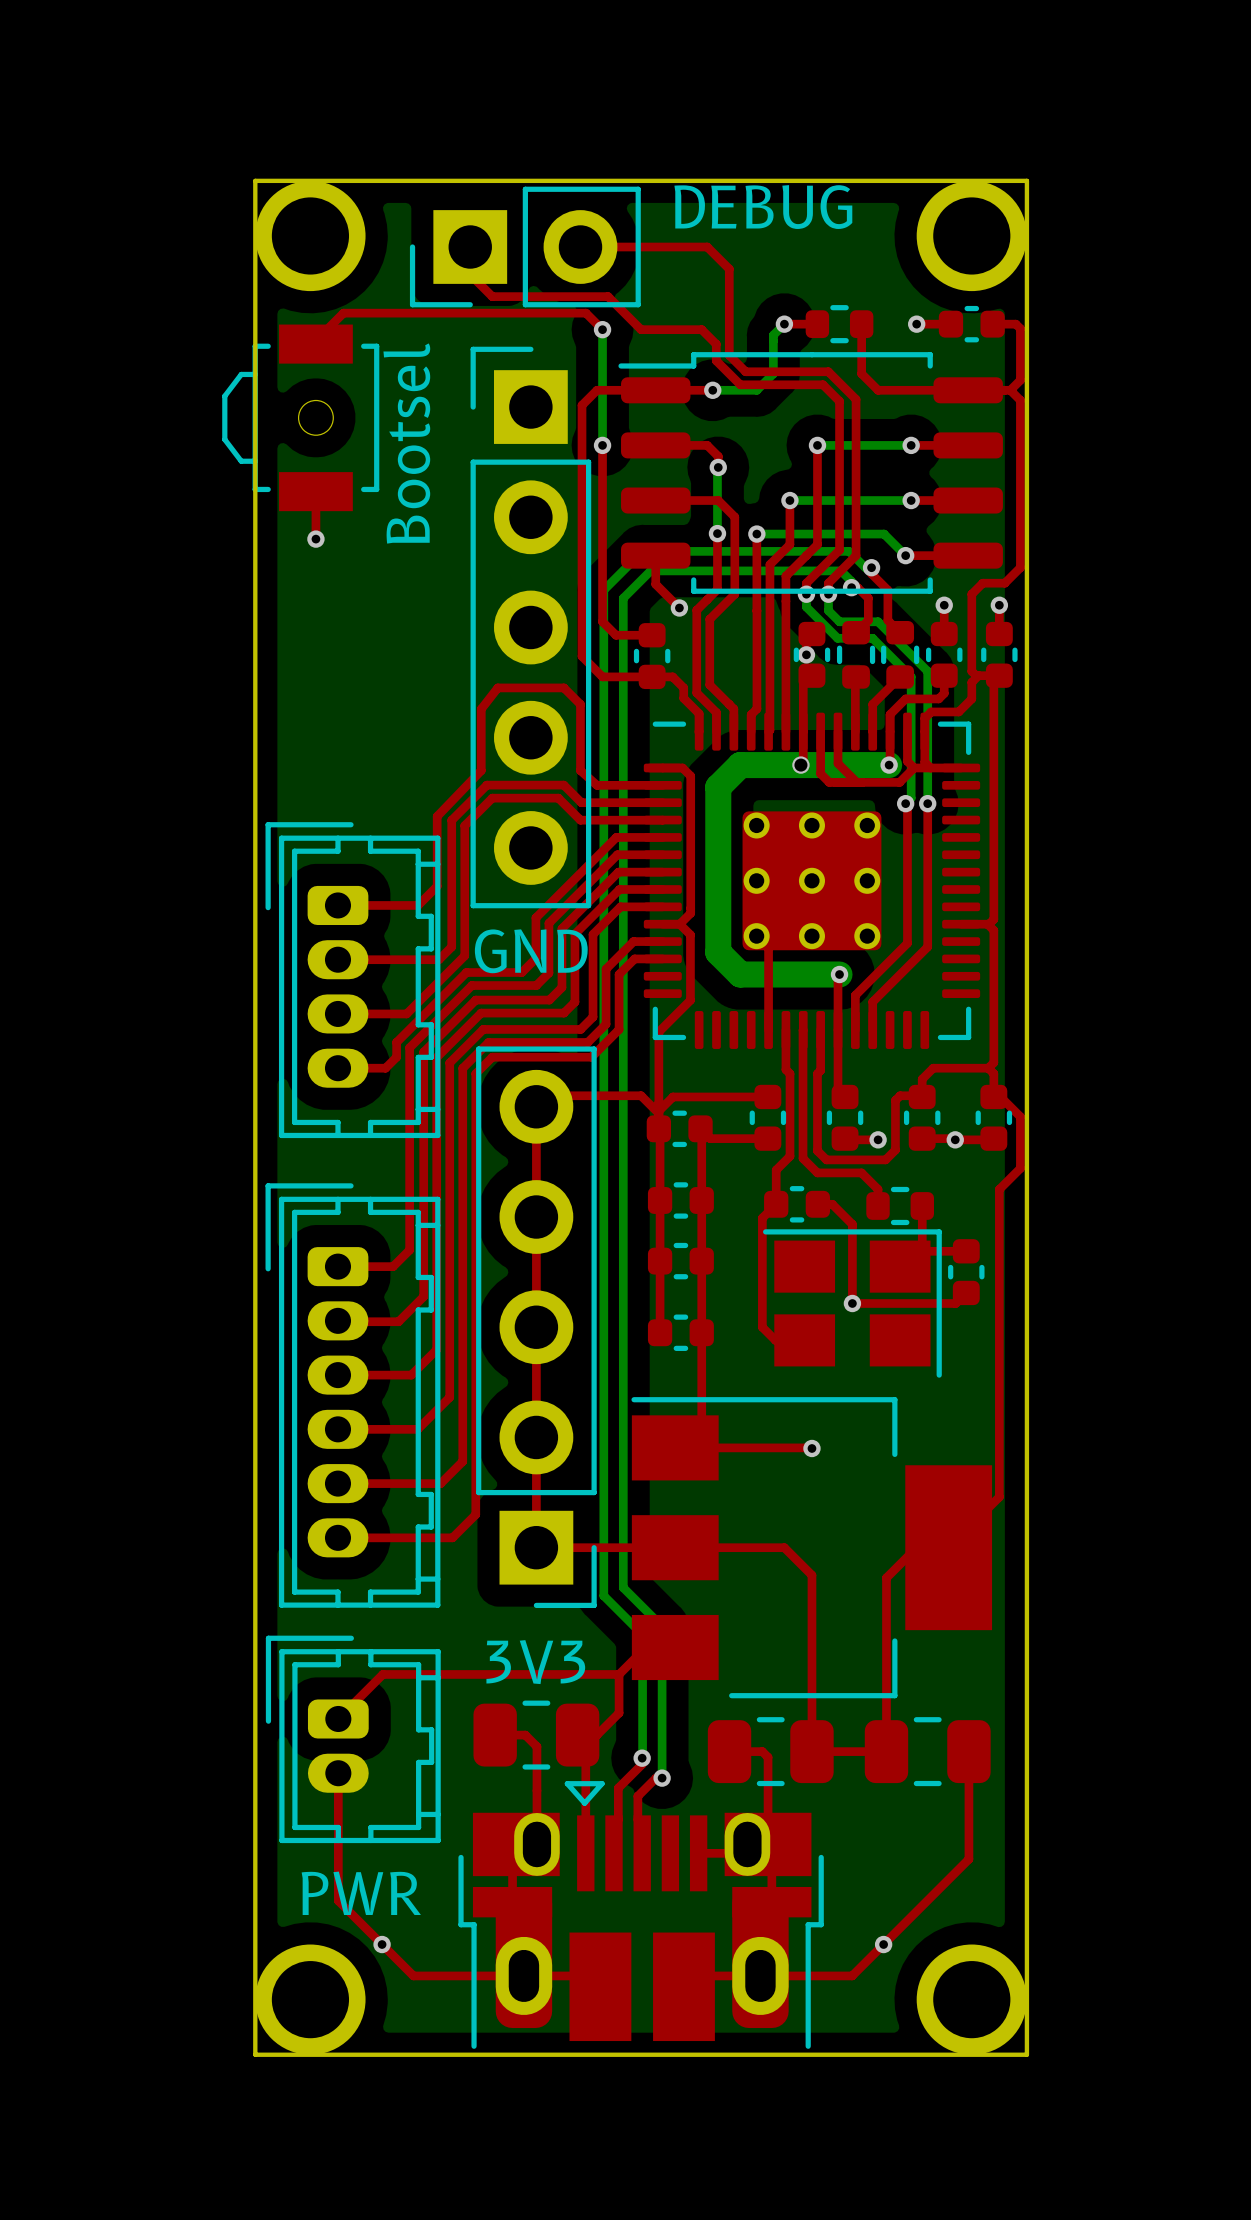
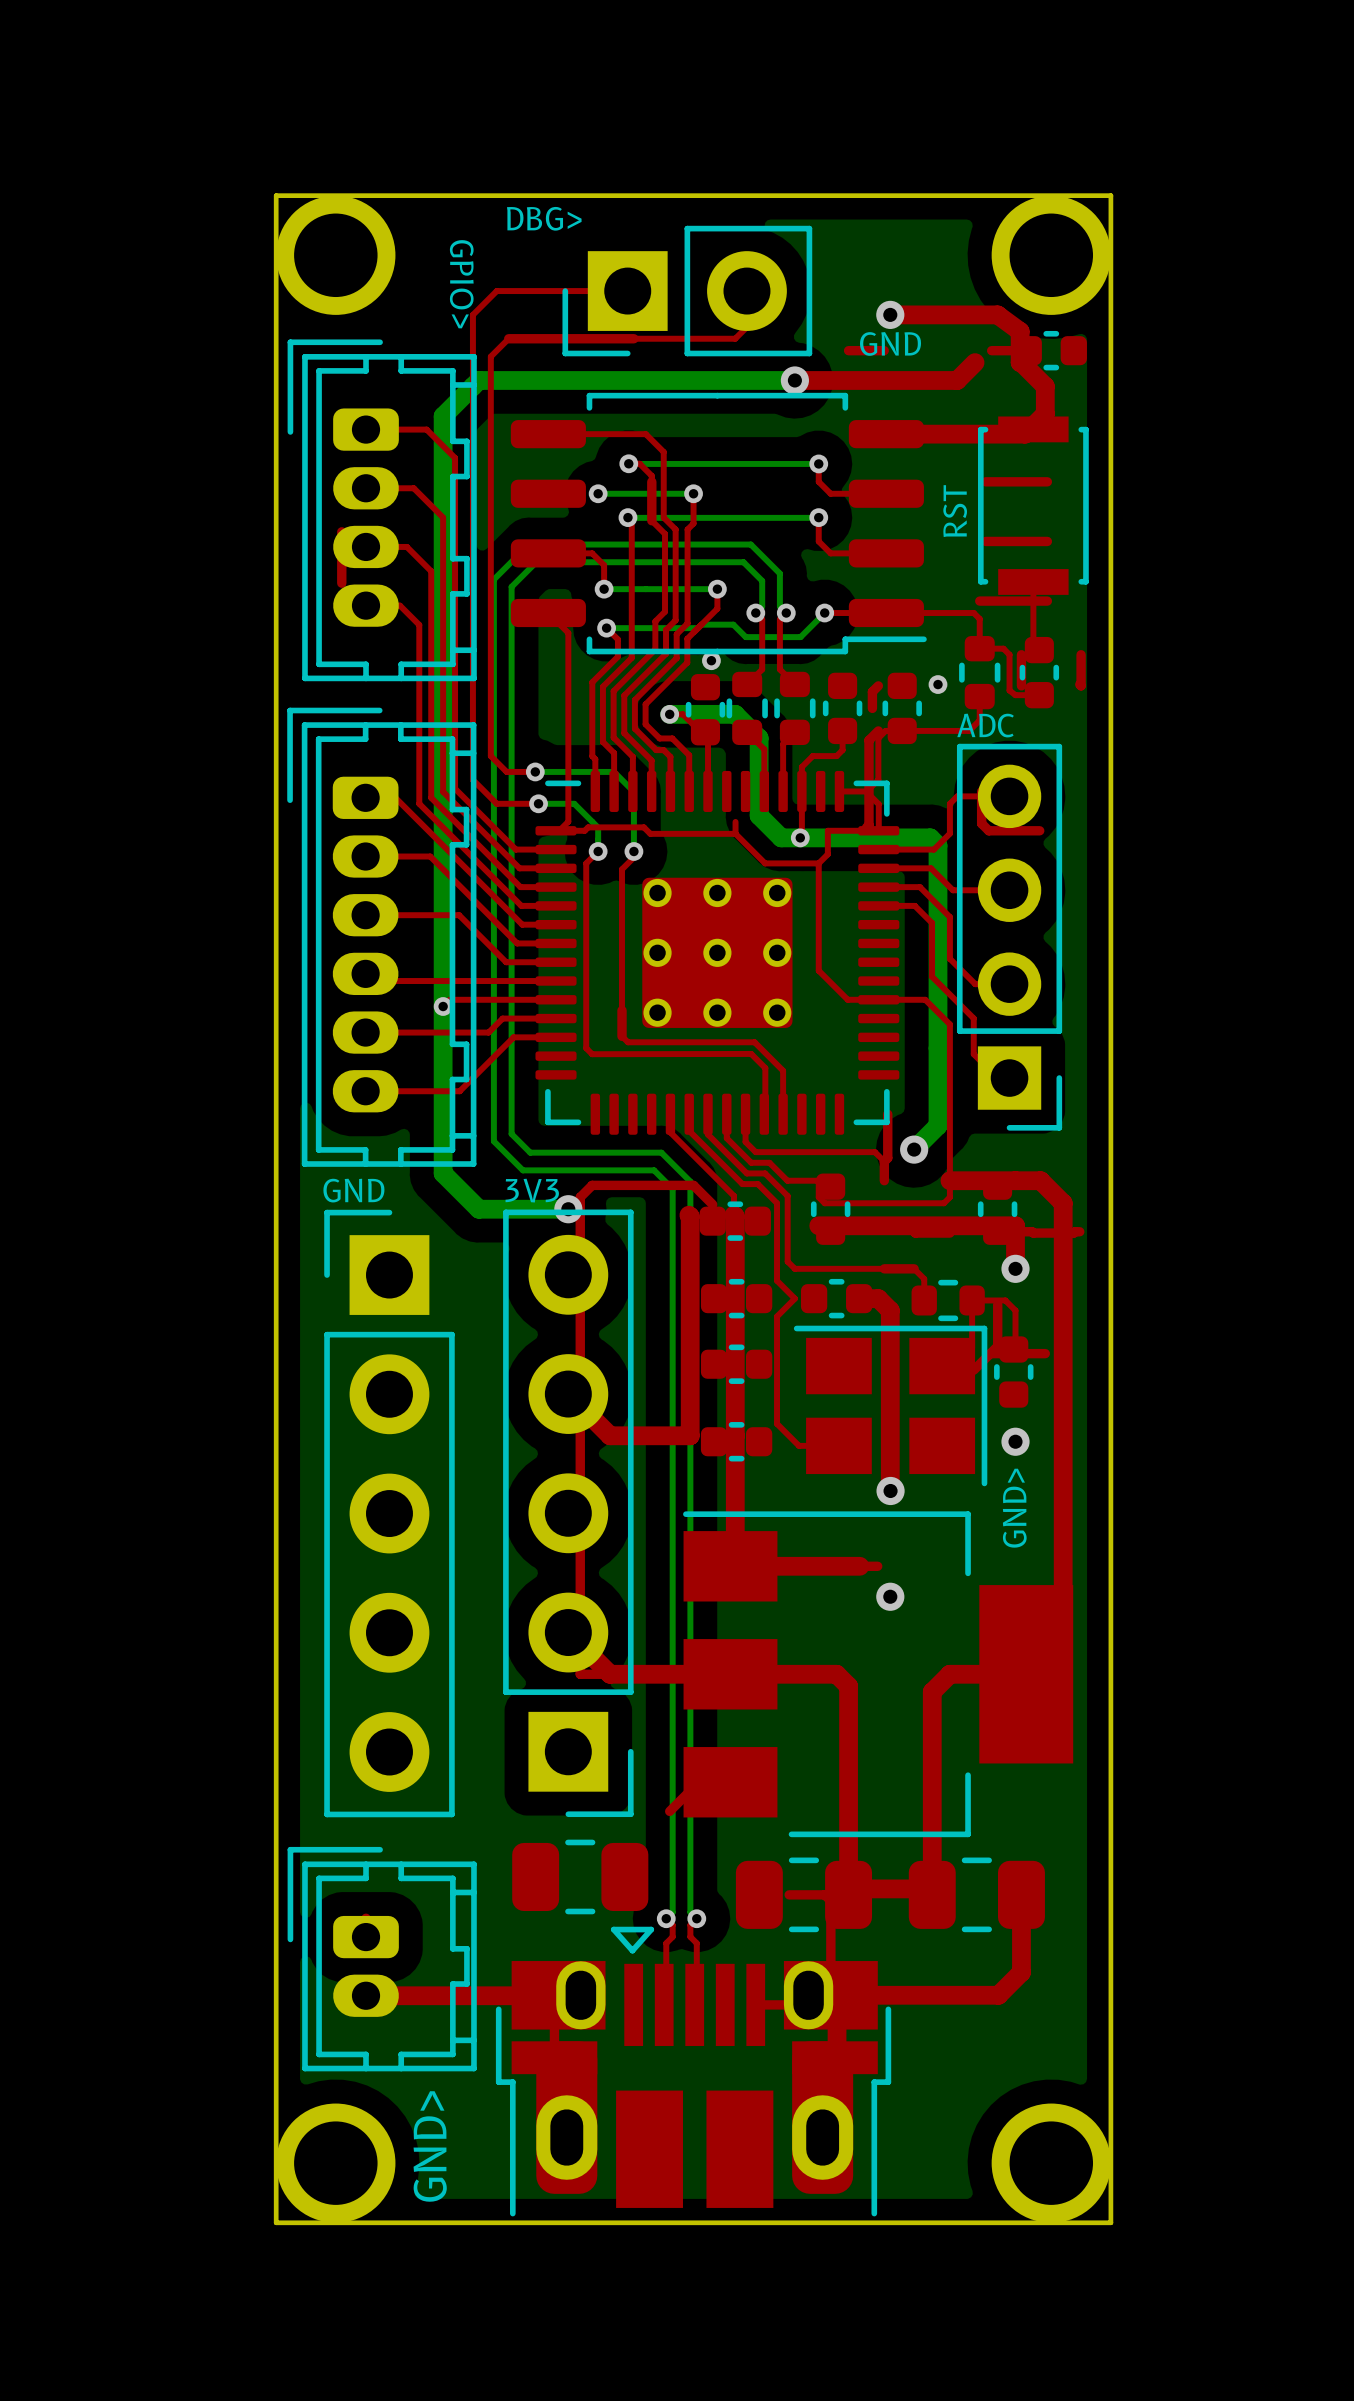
text: none -> DBG> (544, 218)
top track: (470, 247) (470, 274) (492, 296) (608, 296) (641, 329) (701, 329) (716, 344) (716, 360) (740, 384) (822, 384) (839, 401) (839, 550) (806, 583) (806, 594) -> none
part: DEBUG (525, 247) -> none
top track: (580, 247) (707, 247) (729, 269) (729, 355) (745, 371) (828, 371) (856, 399) (856, 555) (828, 583) (828, 594) -> none
text: none -> GPIO> (461, 284)
top track: none -> (627, 291) (496, 291) (472, 314) (472, 779) (496, 803) (538, 803)
part: none -> (687, 291)
top track: none -> (890, 314) (997, 314) (1020, 331) (1020, 362) (1045, 386) (1045, 413) (1025, 434) (886, 434)
via: none -> (890, 314)
top track: (470, 313) (343, 313) (315, 340) -> (508, 338) (490, 356) (490, 756) (506, 771) (535, 771)
top track: (586, 313) (602, 329) -> (633, 338) (735, 338) (746, 327) (746, 291)
text: none -> GND (890, 343)
bottom track: (784, 324) (773, 335) (773, 373) (756, 390) (712, 390) -> none
via: (784, 324) -> none
part: (839, 324) -> none
top track: (861, 324) (861, 373) (878, 390) (1010, 390) -> none
via: (916, 324) -> none
top track: (992, 324) (1015, 324) (1020, 328) (1020, 380) (1010, 390) -> none
bottom track: (602, 329) (602, 445) -> none
via: (602, 329) -> none
top track: none -> (975, 362) (957, 380) (794, 380)
bottom track: none -> (794, 380) (478, 380) (443, 416) (443, 1173) (478, 1209) (568, 1209)
via: none -> (794, 380)
top track: (712, 390) (597, 390) (582, 405) (582, 656) (602, 676) (672, 676) (683, 687) (683, 698) (699, 713) (699, 731) -> none
via: (712, 390) -> none
top track: (1010, 390) (1020, 400) (1020, 567) (1004, 583) (982, 583) (971, 594) (971, 671) (976, 675) (999, 675) (993, 681) (993, 919) (989, 924) (961, 924) -> none
top track: none -> (366, 429) (426, 429) (455, 457) (455, 788) (515, 849) (556, 849)
top track: none -> (548, 434) (645, 434) (663, 452) (663, 517) (675, 529) (675, 620) (666, 629) (666, 653) (624, 695) (624, 733) (651, 760) (651, 791)
part: Bootsel (300, 417) -> none
top track: none -> (628, 463) (639, 463) (651, 475) (651, 481)
bottom track: none -> (628, 463) (818, 463)
via: none -> (628, 463)
top track: none -> (818, 463) (818, 481) (830, 493) (886, 493)
via: none -> (818, 463)
via: (602, 445) -> none
top track: (655, 445) (707, 445) (718, 456) (718, 467) -> none
top track: (817, 445) (817, 544) (785, 576) (785, 731) -> none
bottom track: (817, 445) (911, 445) -> none
via: (817, 445) -> none
via: (911, 445) -> none
top track: none -> (366, 488) (413, 488) (443, 517) (443, 791) (519, 868) (556, 868)
bottom track: none -> (598, 493) (693, 493)
via: none -> (598, 493)
top track: none -> (693, 493) (693, 523) (687, 529) (687, 623) (676, 634) (676, 658) (634, 699) (634, 728) (656, 750) (663, 750) (670, 756) (670, 791)
via: none -> (693, 493)
bottom track: (718, 467) (717, 533) -> none
via: (718, 467) -> none
part: none -> (1033, 505)
part rotation: 0° (810, 472) -> 180° (718, 523)
text: none -> RST (955, 511)
top track: none -> (627, 517) (631, 521) (631, 657) (602, 686) (602, 742) (614, 753) (614, 791)
bottom track: none -> (628, 517) (818, 517)
via: none -> (627, 517)
top track: none -> (818, 517) (818, 541) (830, 553) (886, 553)
via: none -> (818, 517)
top track: (602, 481) (602, 621) (615, 635) (652, 635) -> (651, 520) (665, 533) (665, 611) (655, 621) (655, 649) (613, 691) (613, 737) (632, 756) (632, 791)
top track: (655, 500) (718, 500) (734, 517) (734, 594) (709, 619) (709, 684) (733, 709) (733, 731) -> none
top track: (789, 500) (789, 544) (769, 564) (768, 731) -> none
bottom track: (789, 500) (911, 500) -> none
via: (789, 500) -> none
via: (911, 500) -> none
top track: none -> (366, 546) (406, 546) (431, 571) (431, 797) (520, 887) (556, 887)
top track: none -> (548, 553) (592, 553) (604, 565) (604, 589)
top track: (717, 533) (717, 589) (696, 610) (696, 692) (716, 712) (716, 731) -> none
via: (717, 533) -> none
top track: (756, 534) (756, 610) -> none
bottom track: (756, 534) (884, 534) (905, 555) -> none
via: (756, 534) -> none
via: (315, 539) -> none
top track: none -> (1033, 585) (1033, 644) (1039, 650)
bottom track: none -> (604, 589) (717, 589)
via: none -> (604, 589)
top track: none -> (717, 589) (717, 608) (687, 638) (687, 662) (645, 704) (645, 724) (659, 738) (672, 738) (689, 755) (689, 791)
via: none -> (717, 589)
top track: (655, 555) (655, 584) (679, 608) -> none
via: (905, 555) -> none
top track: none -> (366, 605) (399, 605) (419, 624) (419, 803) (521, 905) (556, 905)
top track: none -> (548, 613) (568, 632) (568, 821) (559, 830)
top track: none -> (755, 613) (762, 619) (762, 669) (747, 684)
bottom track: none -> (755, 613) (762, 606) (762, 580) (743, 562) (536, 562) (511, 586) (511, 1134) (530, 1152) (661, 1152) (690, 1181) (690, 1912) (696, 1918)
via: none -> (755, 613)
top track: none -> (786, 613) (779, 619) (779, 669) (794, 684)
bottom track: none -> (786, 613) (779, 606) (779, 573) (750, 544) (528, 544) (493, 579) (493, 1141) (522, 1170) (654, 1170) (672, 1188) (672, 1912) (666, 1918)
via: none -> (786, 613)
top track: none -> (824, 613) (973, 613) (979, 618) (979, 648) (1003, 648) (1009, 654) (1009, 690) (1015, 695) (1039, 695)
bottom track: none -> (824, 613) (800, 637) (745, 637) (733, 624) (701, 624) (697, 628) (606, 628)
via: none -> (824, 613)
top track: (871, 567) (871, 573) (887, 590) (887, 620) (900, 632) -> none
bottom track: (871, 567) (865, 567) (849, 551) (642, 551) (603, 590) (603, 1595) (642, 1634) (642, 1757) -> none
via: (871, 567) -> none
top track: none -> (606, 628) (617, 639) (617, 656) (592, 682) (592, 756) (595, 759) (595, 791)
via: none -> (606, 628)
top track: (851, 587) (857, 587) (868, 598) (868, 620) (856, 632) -> none
bottom track: (851, 587) (851, 581) (840, 570) (650, 570) (623, 598) (623, 1587) (662, 1626) (662, 1778) -> none
via: (851, 587) -> none
bottom track: (806, 594) (806, 607) (837, 638) (872, 638) (911, 676) (911, 798) (905, 803) -> none
via: (806, 594) -> none
bottom track: (828, 594) (828, 610) (839, 621) (878, 621) (927, 671) (927, 803) -> none
via: (828, 594) -> none
via: (944, 605) -> none
via: (999, 605) -> none
via position: (679, 608) -> (711, 660)
top track: (756, 610) (756, 708) (751, 714) (751, 731) -> none
part: none -> (979, 672)
part: none -> (1039, 672)
part: GND (530, 627) -> none
via: none -> (937, 684)
top track: none -> (979, 696) (979, 720) (969, 730) (885, 730) (878, 738) (878, 779) (866, 791) (839, 791)
part: none -> (747, 708)
part: none -> (794, 708)
part: none -> (842, 708)
via: (806, 654) -> none
part: (811, 654) -> none
part: none -> (902, 708)
part: (856, 654) -> none
part: (900, 654) -> none
part: (944, 654) -> none
part: (999, 654) -> none
top track: none -> (669, 714) (682, 714) (708, 739) (708, 791)
bottom track: none -> (669, 714) (735, 714) (759, 738) (759, 815) (781, 837) (930, 837) (937, 845) (937, 1125) (914, 1149)
via: none -> (669, 714)
text: none -> ADC (985, 725)
top track: none -> (842, 730) (842, 750) (836, 756) (812, 756) (801, 766) (801, 836) (800, 837)
top track: (944, 675) (944, 693) (938, 698) (905, 698) (890, 714) (889, 765) -> none
top track: (978, 675) (971, 682) (971, 698) (958, 711) (931, 711) (924, 718) (924, 762) (930, 767) -> none
top track: none -> (747, 732) (764, 749) (764, 791)
top track: none -> (794, 732) (783, 744) (783, 791)
top track: (856, 676) (855, 731) -> none
top track: (900, 676) (872, 704) (872, 731) -> none
bottom track: none -> (535, 771) (614, 771) (633, 791) (633, 851)
via: none -> (535, 771)
top track: none -> (866, 791) (878, 804) (878, 830) (827, 830) (827, 854) (818, 863)
top track: (820, 731) (820, 773) (829, 782) (899, 782) (914, 767) -> none
top track: (838, 731) (838, 763) (856, 782) -> none
top track: none -> (1009, 796) (957, 796) (949, 803) (949, 833) (933, 849) (878, 849)
top track: none -> (365, 797) (395, 797) (522, 924) (556, 924)
bottom track: none -> (538, 803) (574, 803) (598, 827) (598, 851)
via: none -> (538, 803)
top track: none -> (735, 821) (735, 833)
via: (800, 765) -> none
bottom track: (889, 765) (740, 765) (718, 787) (718, 952) (740, 974) (839, 974) -> none
via: (889, 765) -> none
top track: none -> (556, 830) (584, 830) (588, 827) (643, 827) (650, 833) (735, 833)
top track: (649, 767) (682, 767) (690, 776) (690, 913) (679, 924) (690, 934) (690, 1000) (658, 1031) (660, 1332) (663, 1329) -> none
top track: none -> (735, 833) (765, 863) (818, 863)
via: none -> (800, 837)
top track: (662, 785) (597, 785) (580, 770) (580, 704) (563, 687) (497, 687) (481, 709) (481, 770) (437, 816) (437, 886) (418, 905) (337, 905) -> none
top track: none -> (598, 851) (586, 863) (586, 1048) (592, 1054) (751, 1053) (765, 1068) (764, 1114)
via: none -> (598, 851)
via: none -> (633, 851)
top track: none -> (365, 856) (430, 856) (517, 943) (556, 943)
top track: none -> (818, 863) (818, 970) (847, 999) (925, 999) (949, 1024) (949, 1197) (943, 1203) (824, 1203) (818, 1197) (818, 1180) (787, 1180) (769, 1162) (751, 1162) (726, 1138) (726, 1114)
top track: (662, 802) (581, 802) (563, 785) (486, 785) (451, 820) (451, 946) (438, 959) (337, 959) -> none
top track: none -> (878, 868) (931, 868) (952, 890) (1009, 890)
top track: (905, 803) (907, 805) (907, 943) (855, 995) (855, 1029) -> none
via: (905, 803) -> none
top track: (927, 803) (927, 946) (872, 1001) (872, 1029) -> none
via: (927, 803) -> none
top track: (662, 820) (580, 820) (558, 798) (492, 798) (464, 825) (464, 955) (406, 1013) (337, 1013) -> none
top track: none -> (878, 887) (919, 887) (949, 917) (949, 958) (975, 984) (1009, 984)
top track: (662, 837) (616, 837) (535, 917) (535, 958) (521, 972) (466, 972) (396, 1042) (396, 1057) (385, 1068) (337, 1068) -> none
top track: none -> (878, 905) (914, 905) (932, 923) (932, 976) (973, 1018) (973, 1054) (997, 1078) (1009, 1078)
top track: none -> (365, 915) (459, 915) (506, 962) (556, 962)
top track: (662, 854) (617, 854) (548, 923) (548, 972) (536, 985) (471, 985) (409, 1047) (409, 1250) (393, 1266) (337, 1266) -> none
part: none -> (381, 937)
part: none -> (1009, 937)
top track: (662, 872) (618, 872) (561, 928) (561, 987) (549, 1000) (475, 1000) (423, 1052) (423, 1296) (398, 1321) (337, 1320) -> none
part position: (811, 880) -> (717, 952)
top track: (662, 889) (619, 889) (574, 934) -> (633, 851) (633, 857) (622, 869) (622, 1010)
top track: none -> (365, 973) (372, 981) (556, 981)
top track: (662, 906) (620, 906) (593, 934) (593, 1017) (580, 1029) (483, 1029) (449, 1062) (449, 1397) (417, 1429) (337, 1429) -> none
top track: none -> (556, 999) (449, 999) (443, 1006)
top track: (987, 924) (993, 930) (993, 1062) (988, 1068) -> none
via: none -> (443, 1006)
top track: (756, 936) (768, 948) (768, 1029) -> none
top track: none -> (556, 1018) (502, 1018) (488, 1032) (365, 1032)
top track: (662, 941) (633, 941) (606, 969) (606, 1024) (587, 1042) (488, 1042) (462, 1068) (462, 1461) (440, 1483) (337, 1483) -> none
top track: (574, 957) (574, 1002) (563, 1013) (481, 1013) (436, 1057) (436, 1349) (411, 1375) (337, 1375) -> (622, 1036) (627, 1042) (754, 1042) (783, 1070) (783, 1114)
top track: none -> (556, 1037) (513, 1037) (459, 1091) (365, 1091)
top track: (662, 958) (634, 958) (619, 974) (619, 1029) (591, 1057) (492, 1057) (475, 1073) (475, 1514) (452, 1537) (337, 1537) -> none
top track: (839, 974) (838, 1089) (845, 1096) -> none
via: (839, 974) -> none
part position: (352, 980) -> (382, 510)
top track: none -> (689, 1114) (689, 1130) (742, 1184) (757, 1184) (777, 1203) (777, 1280) (794, 1298) (777, 1316) (777, 1423) (799, 1445) (838, 1445)
top track: none -> (745, 1114) (745, 1141) (755, 1152) (874, 1152) (884, 1161)
top track: (785, 1029) (785, 1069) (790, 1073) (790, 1156) (776, 1170) (776, 1204) (762, 1218) (762, 1327) (775, 1340) (804, 1340) -> none
top track: (803, 1030) (803, 1158) (817, 1172) -> (708, 1114) (708, 1134) (746, 1173) (765, 1173) (787, 1196) (787, 1261) (794, 1268) (884, 1268)
via: none -> (914, 1149)
top track: (988, 1068) (993, 1073) (993, 1096) (1000, 1096) (1020, 1116) (1020, 1168) (999, 1189) (999, 1497) (948, 1547) -> (949, 1180) (1040, 1180) (1063, 1203) (1063, 1644) (1033, 1674) (1026, 1674)
top track: (988, 1068) (933, 1068) (922, 1079) (922, 1096) (900, 1095) (895, 1100) (895, 1150) (885, 1159) (826, 1159) (817, 1150) (817, 1091) -> none
top track: (767, 1096) (672, 1096) (658, 1111) -> none
text: none -> GND (353, 1190)
text: none -> 3V3 (532, 1190)
via: none -> (568, 1209)
part: (845, 1117) -> none
part: (993, 1117) -> none
top track: none -> (688, 1215) (690, 1435) (610, 1435) (568, 1394)
top track: (700, 1128) (710, 1138) (767, 1138) -> none
top track: (701, 1130) (701, 1421) (679, 1443) -> (669, 1114) (670, 1132) (733, 1195) (735, 1561)
top track: none -> (818, 1225) (1015, 1225) (1015, 1268)
via: (878, 1139) -> none
via: (955, 1139) -> none
top track: (845, 1172) (861, 1172) (878, 1189) (878, 1205) -> (914, 1268) (924, 1278) (924, 1300)
via: none -> (1015, 1268)
part footprint: [265, 1183, 441, 1608] -> [324, 1209, 455, 1818]
top track: none -> (859, 1298) (878, 1298) (890, 1310) (890, 1490)
part position: (797, 1204) -> (836, 1298)
top track: (817, 1204) (832, 1204) (852, 1224) (852, 1303) (955, 1303) (966, 1292) -> none
part position: (900, 1205) -> (948, 1300)
top track: none -> (1013, 1349) (1015, 1347) (1015, 1310) (1005, 1300) (972, 1300) (972, 1347) (954, 1366) (942, 1366)
part position: (966, 1272) -> (1013, 1372)
part position: (852, 1303) -> (890, 1405)
via: (852, 1303) -> none
part: 3V3 (536, 1327) -> none
via: none -> (1015, 1441)
via: none -> (890, 1490)
text: none -> GND> (1014, 1508)
part: none -> (568, 1513)
top track width: thin (679, 1443) (675, 1447) (794, 1447) -> thick (735, 1561) (730, 1566) (859, 1566)
via: (811, 1448) -> none
via: none -> (890, 1596)
top track width: thin (536, 1519) (564, 1547) (773, 1547) -> thick (580, 1644) (610, 1674) (836, 1674)
top track: (773, 1547) (784, 1547) (811, 1575) (811, 1751) (886, 1751) (886, 1577) (916, 1547) -> (836, 1674) (848, 1686) (848, 1888) (932, 1888) (932, 1691) (949, 1674) (991, 1674)
top track: (338, 1718) (382, 1674) (619, 1674) (619, 1713) (597, 1735) (577, 1735) (585, 1743) (585, 1853) -> none
top track: (495, 1735) (525, 1735) (536, 1746) (536, 1844) -> (366, 1995) (582, 1995)
part: PWR (353, 1739) -> none
top track: none -> (1021, 1888) (1021, 1972) (998, 1995) (832, 1995) (837, 1999) (837, 2057)
part position: (770, 1751) -> (803, 1894)
part position: (927, 1751) -> (976, 1894)
top track: (971, 1754) (968, 1751) (968, 1859) (852, 1975) (694, 1975) (683, 1986) -> none
top track: (642, 1758) (642, 1764) (618, 1788) (618, 1819) (613, 1824) (613, 1853) -> none
via position: (642, 1758) -> (696, 1918)
top track: none -> (666, 1918) (672, 1925) (672, 1936) (666, 1943) (666, 2004)
via: none -> (666, 1918)
top track: none -> (696, 1918) (690, 1925) (690, 1936) (696, 1943) (696, 2004)
top track: (662, 1778) (655, 1778) (637, 1796) (637, 1819) (642, 1824) (642, 1853) -> none
via: (662, 1778) -> none
top track: (338, 1790) (338, 1900) (413, 1975) (589, 1975) (600, 1986) -> none
part: none -> (382, 1959)
via: (382, 1944) -> none
via: (883, 1944) -> none
text: none -> GND> (430, 2146)

